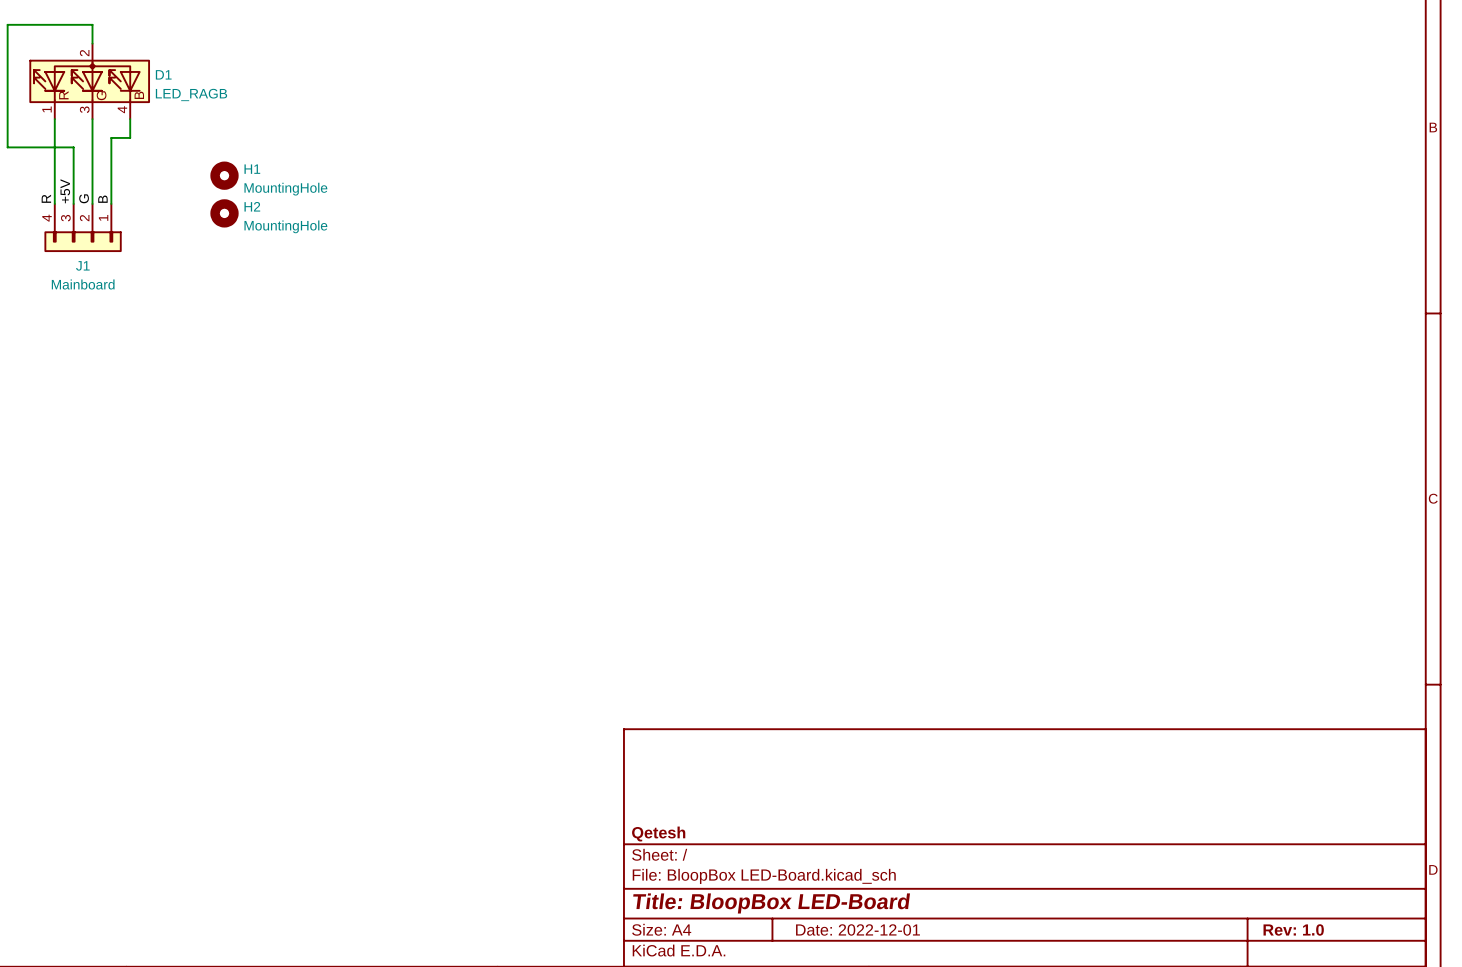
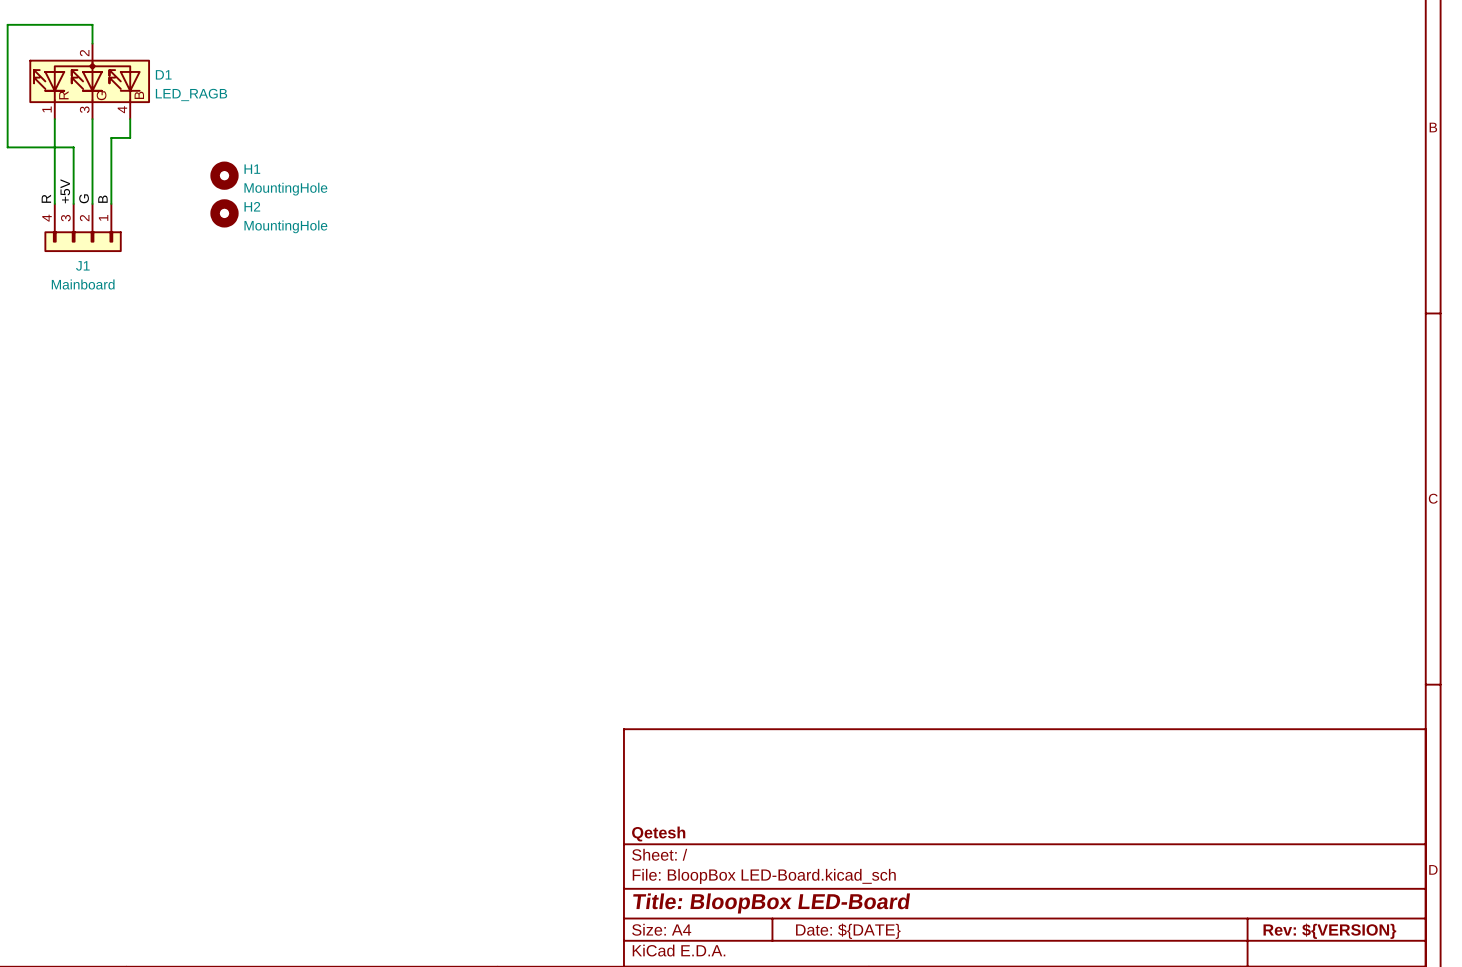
title block: Date: 2022-12-01 (857, 929) -> Date: ${DATE} (848, 931)
title block: Rev: 1.0 (1293, 929) -> Rev: ${VERSION} (1329, 931)

